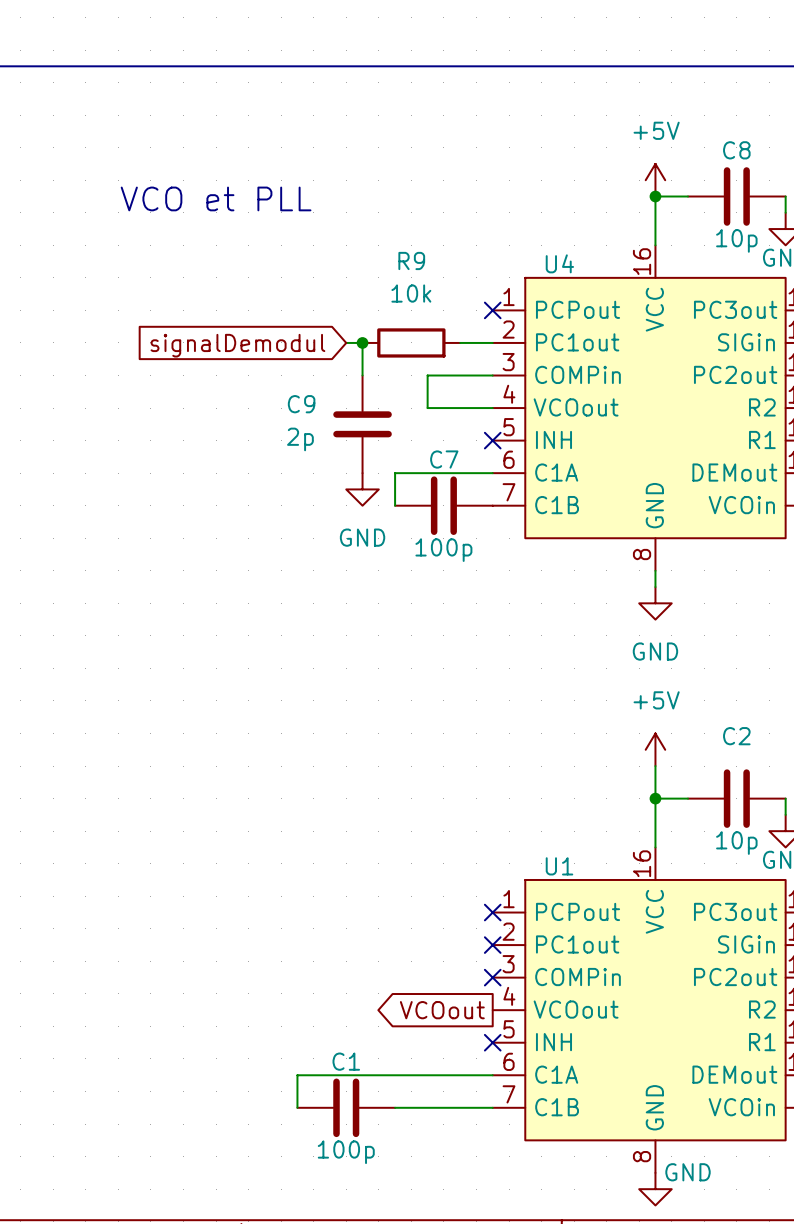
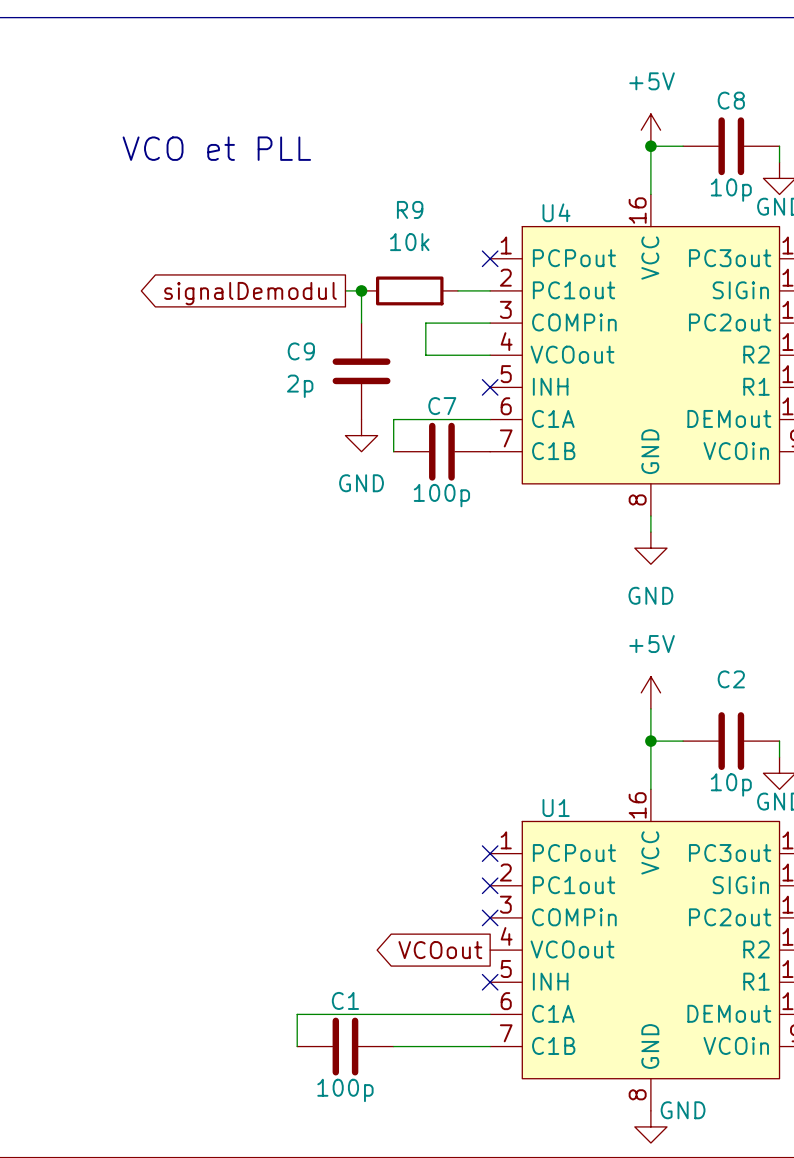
global label shape: input (237, 345) -> output (250, 293)

